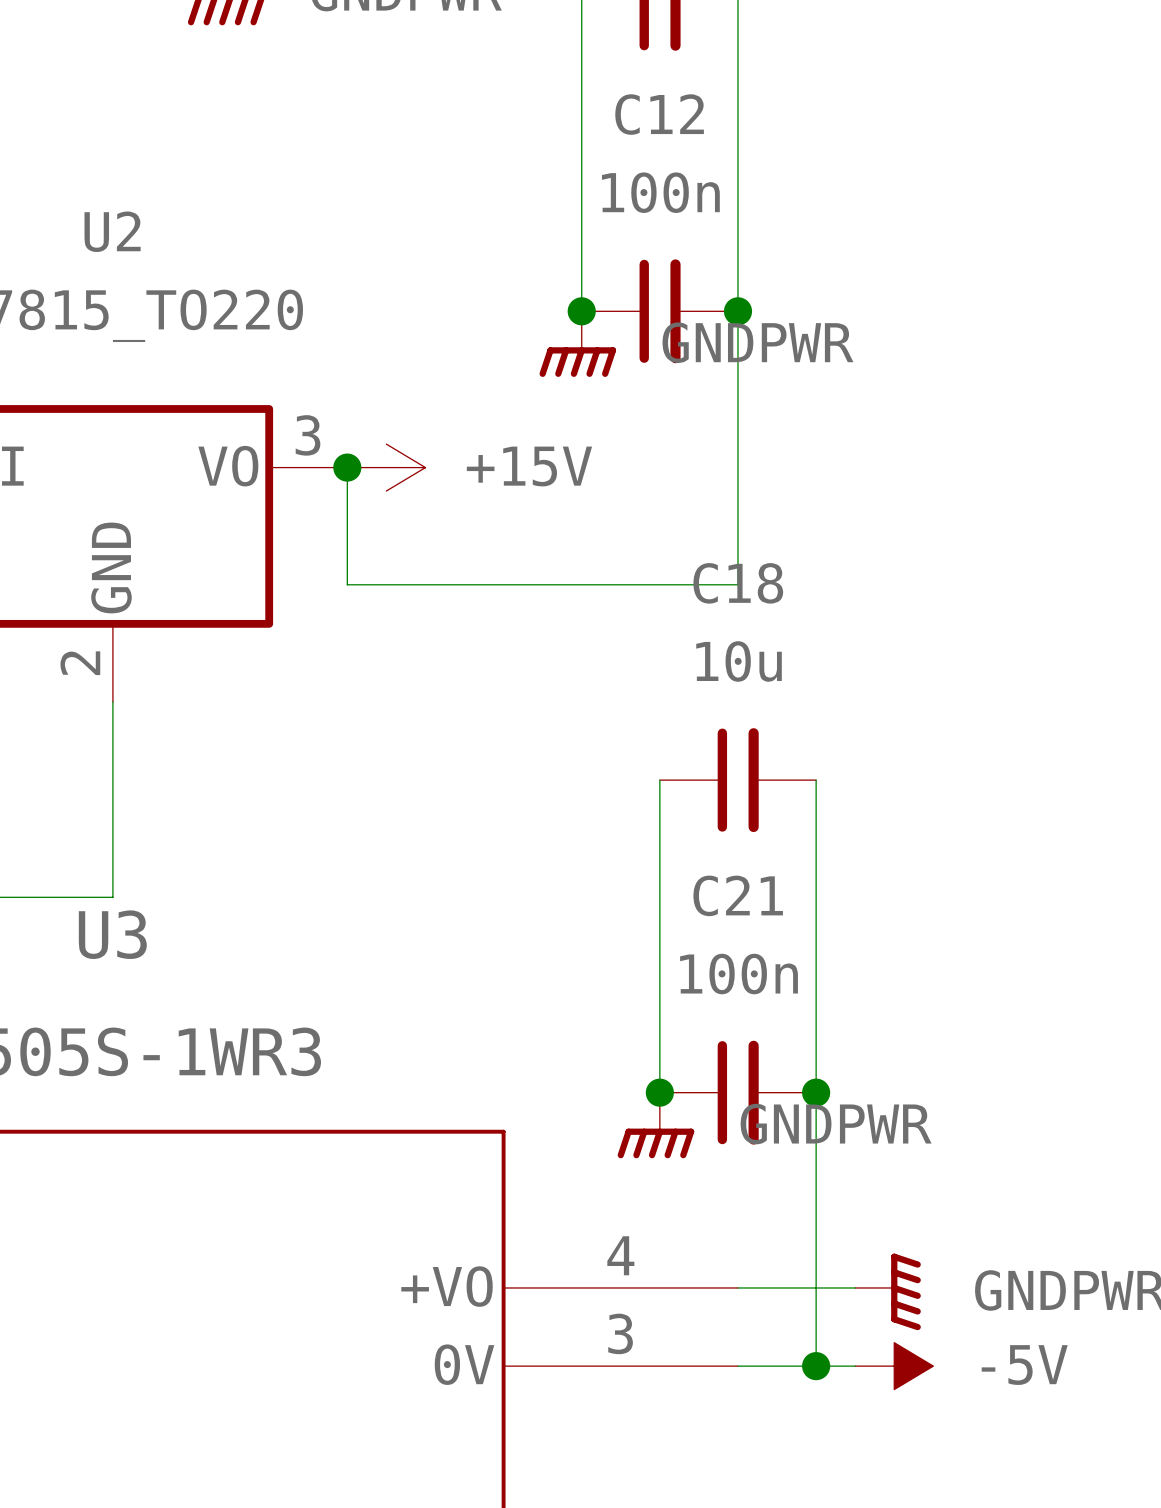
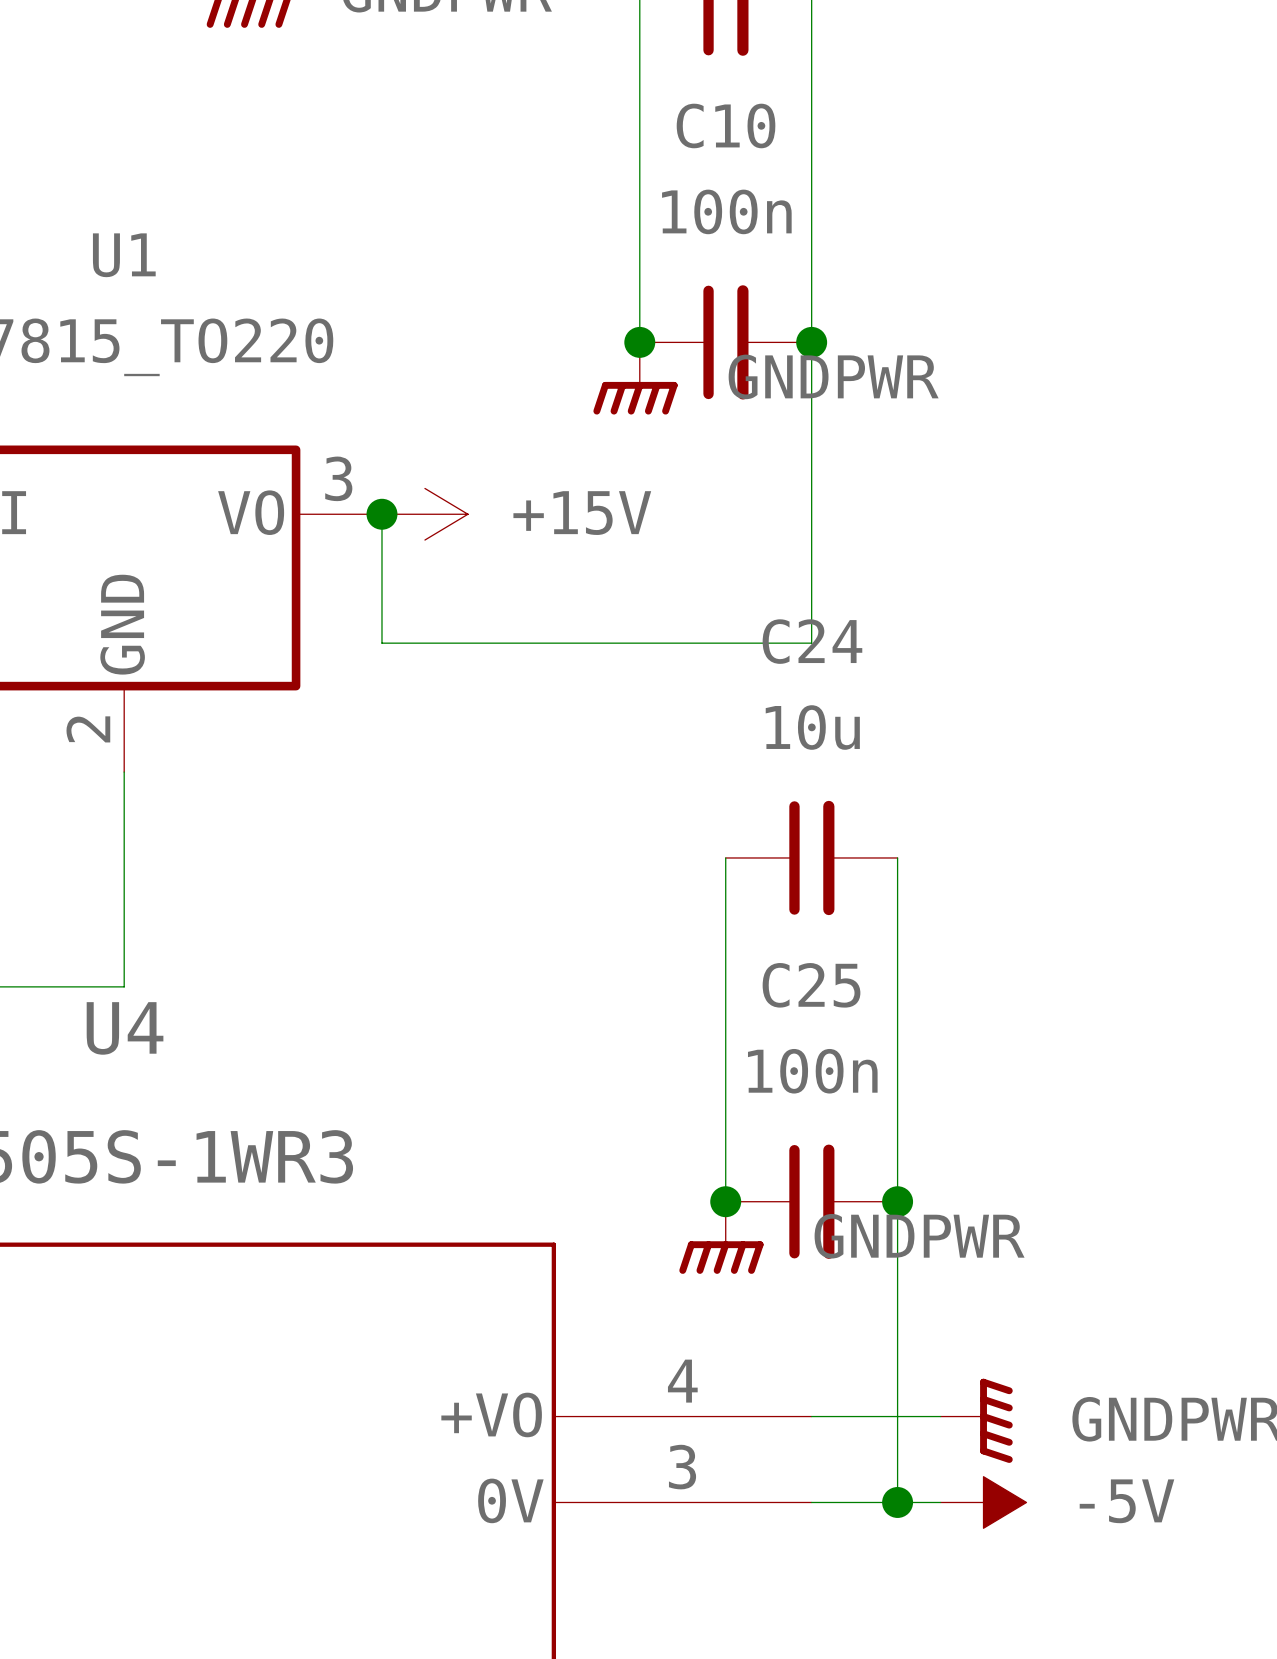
C12 name: C12 (659, 114) -> C10 (726, 125)
U2 name: U2 (112, 231) -> U1 (124, 255)
C18 name: C18 (738, 583) -> C24 (812, 641)
C21 name: C21 (738, 895) -> C25 (811, 985)
U3 name: U3 (112, 934) -> U4 (125, 1028)

